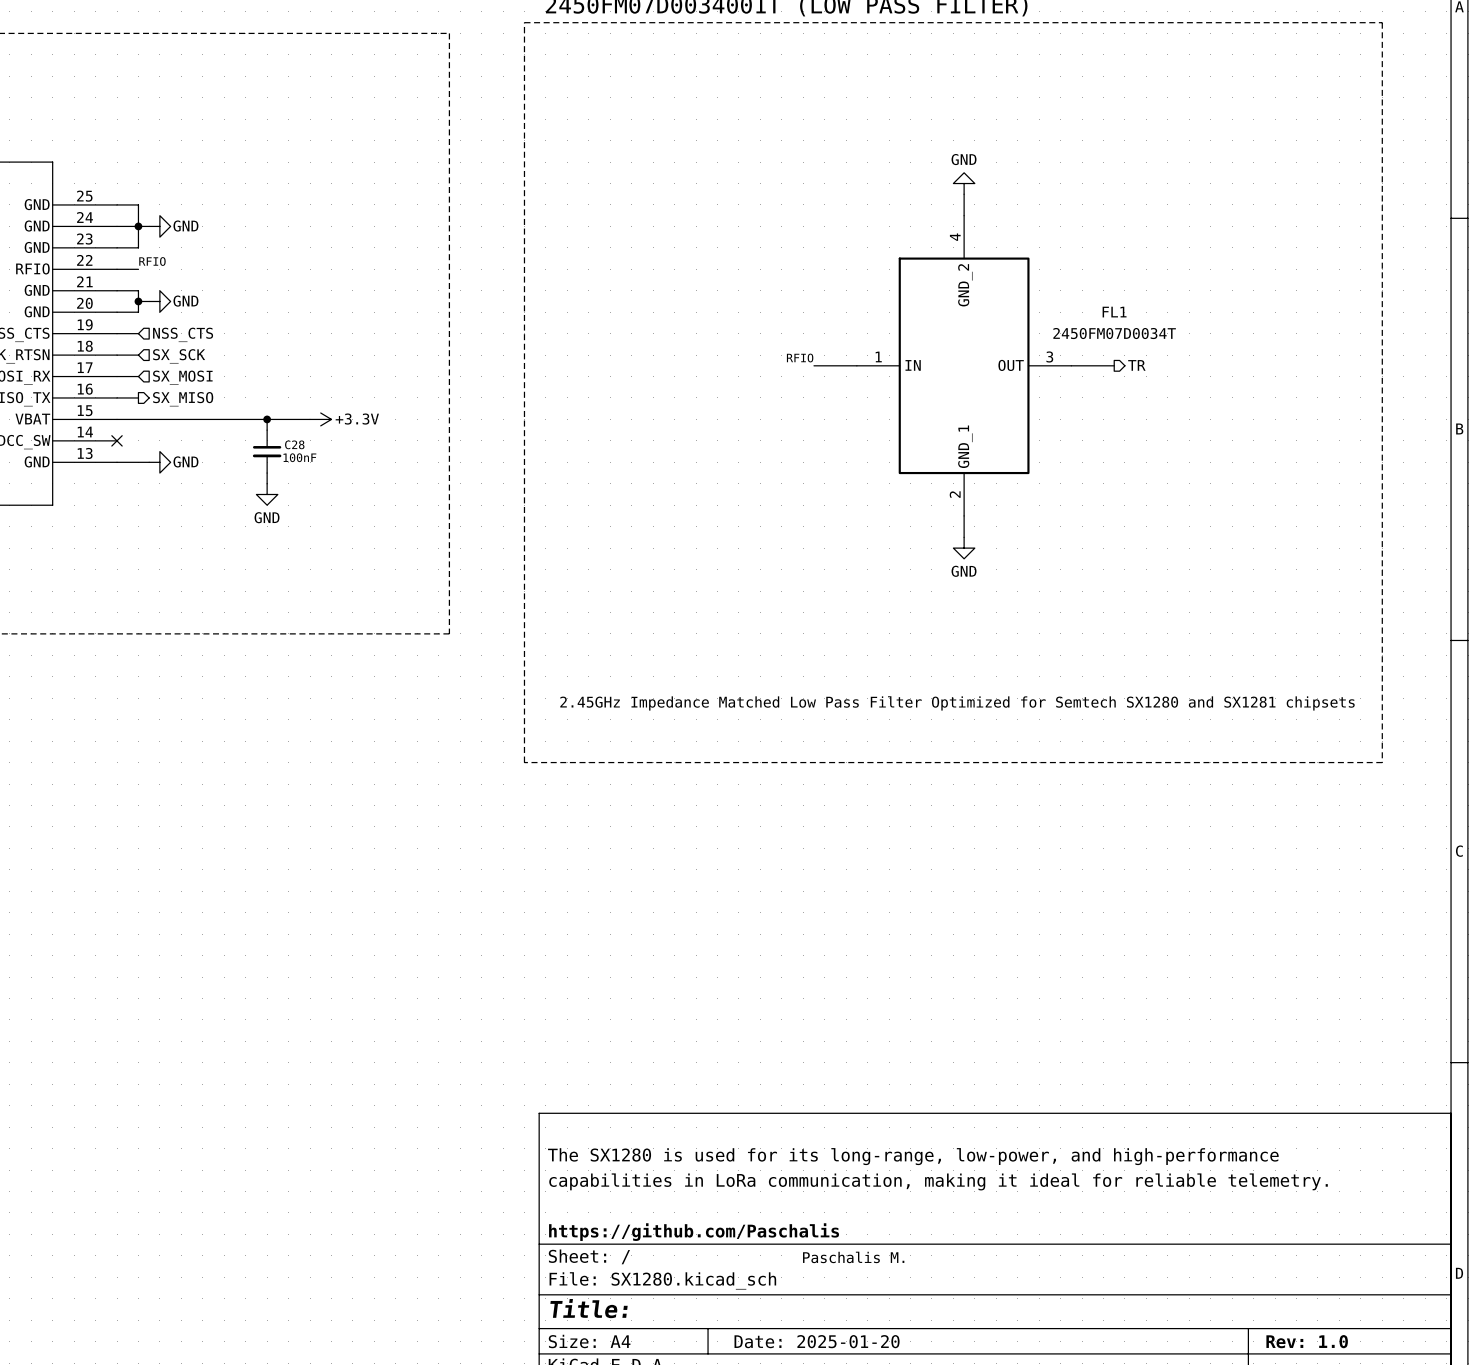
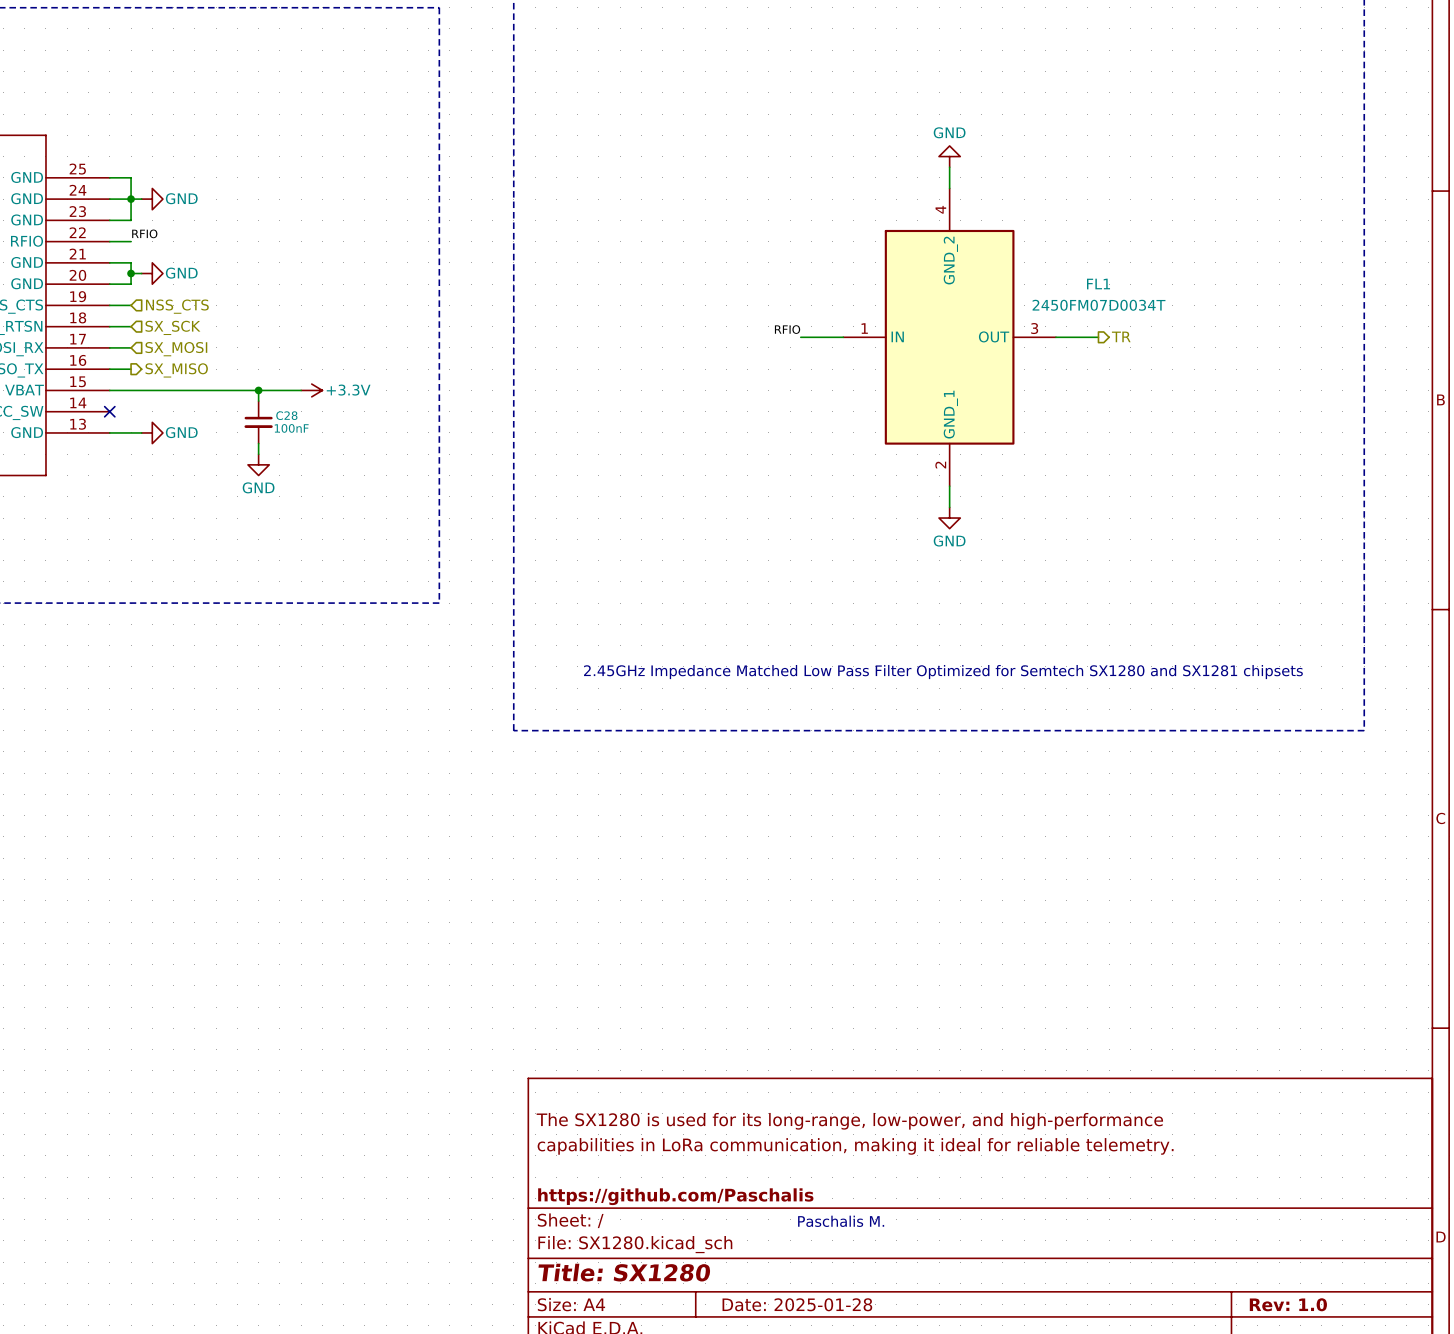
title block: Title: (589, 1308) -> Title: SX1280 (624, 1272)
title block: Date: 2025-01-20 (817, 1341) -> Date: 2025-01-28 (797, 1304)

